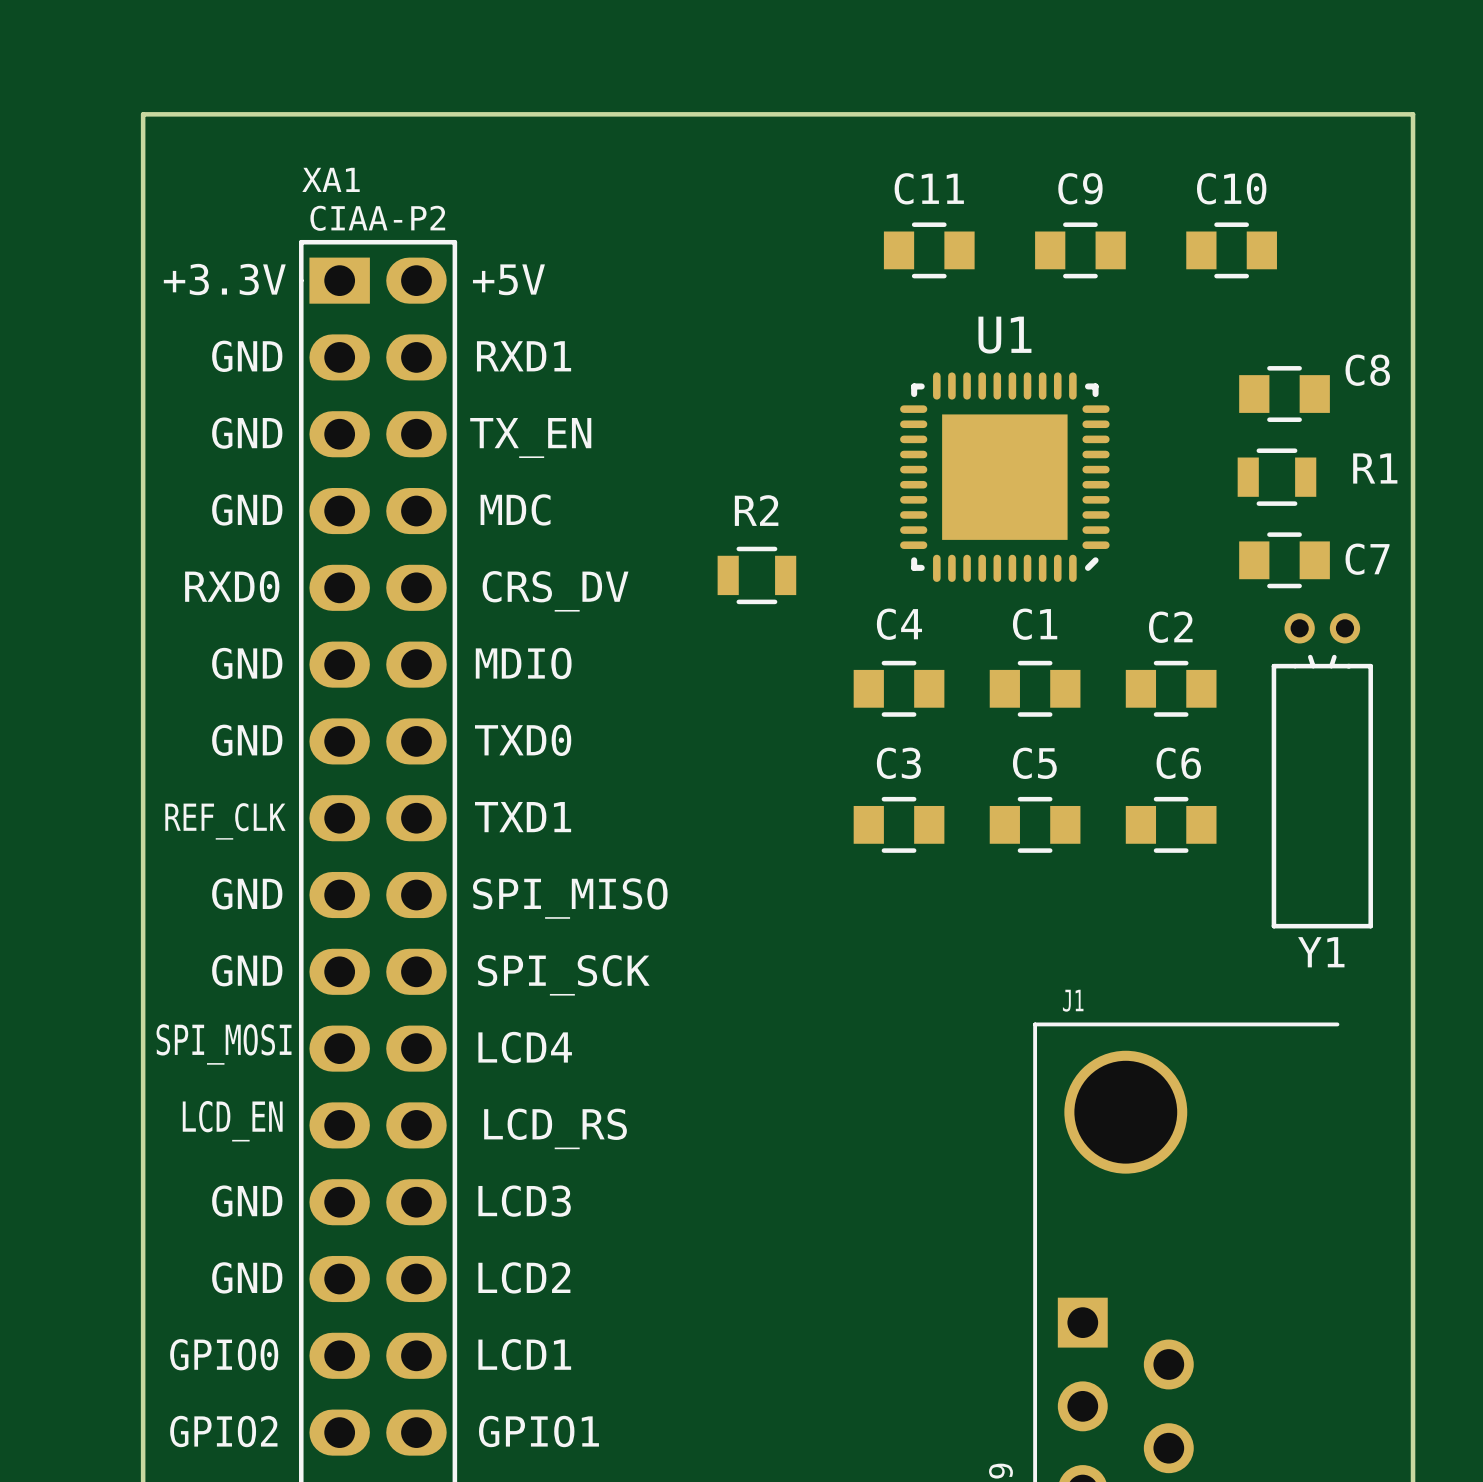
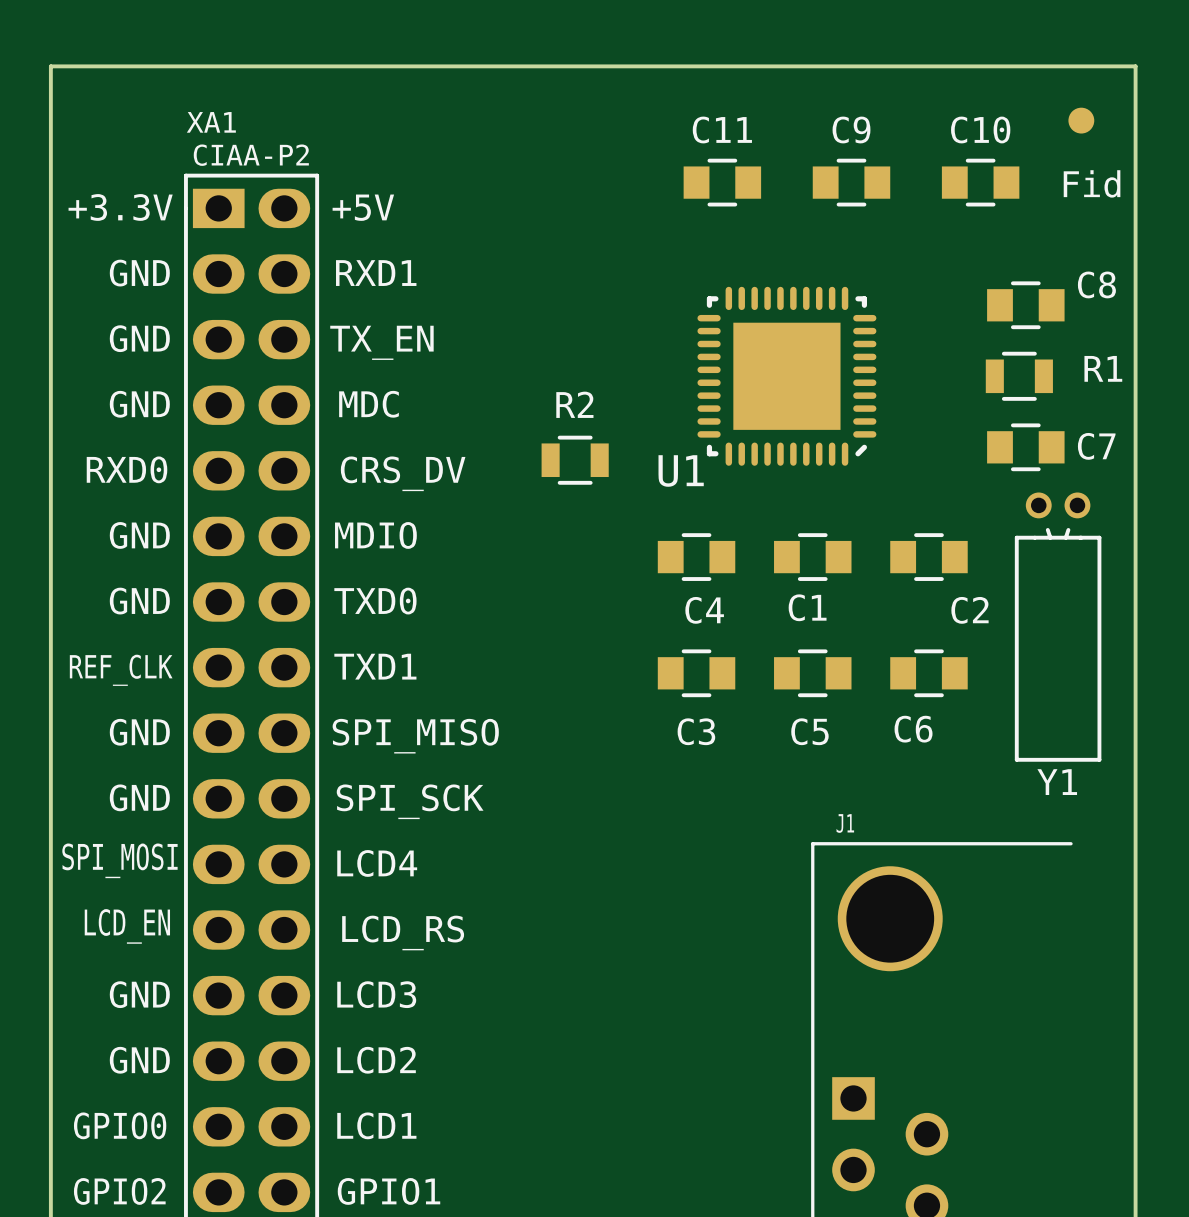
Fid: none -> (1081, 120)
U1 name position: U1 (1004, 335) -> U1 (681, 470)
C4 name position: C4 (899, 624) -> C4 (704, 610)
C1 name position: C1 (1035, 624) -> C1 (807, 607)
C2 name position: C2 (1170, 627) -> C2 (969, 610)
C3 name position: C3 (898, 763) -> C3 (696, 731)
C5 name position: C5 (1034, 763) -> C5 (809, 731)
C6 name position: C6 (1178, 763) -> C6 (913, 729)

